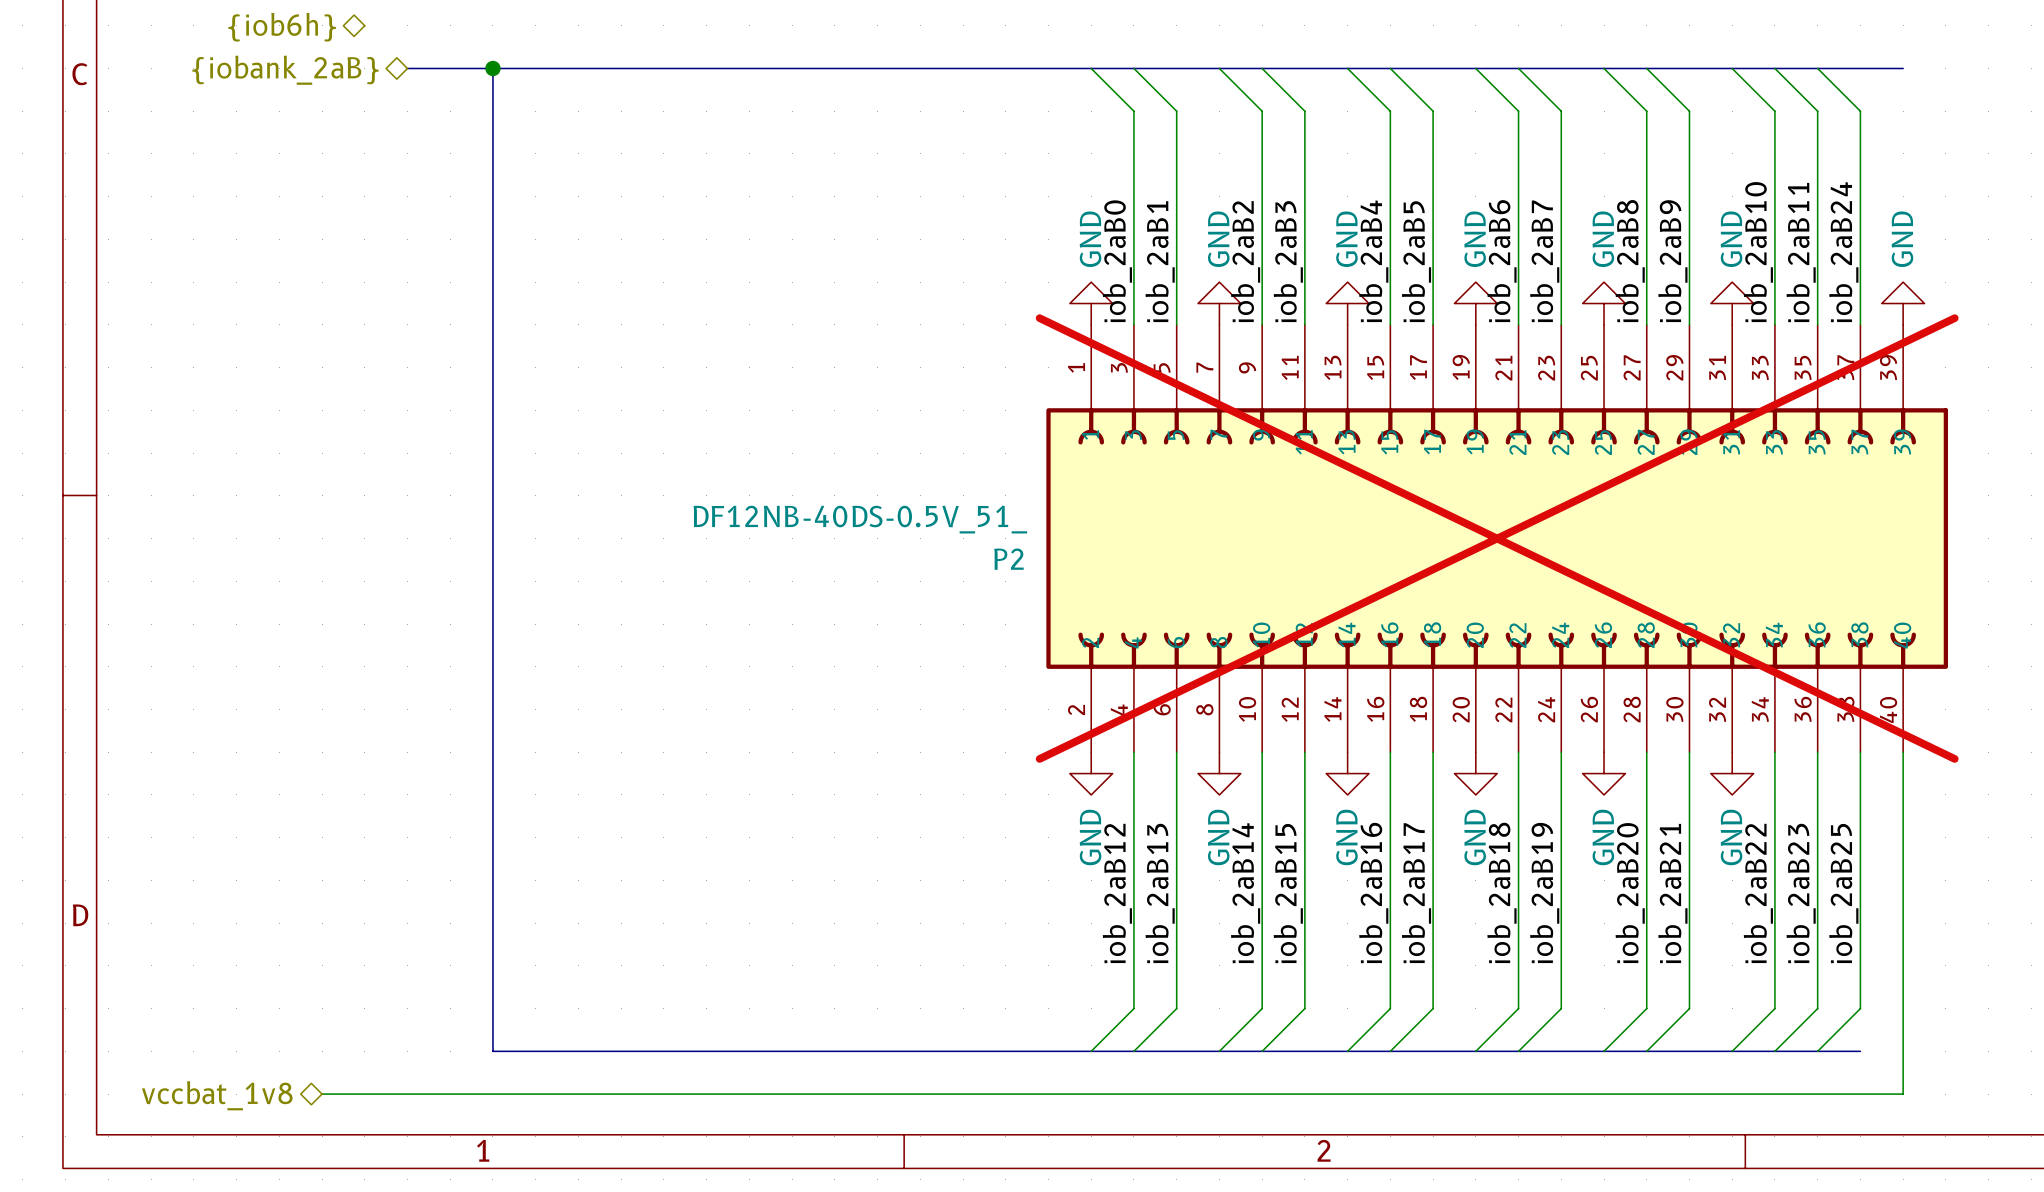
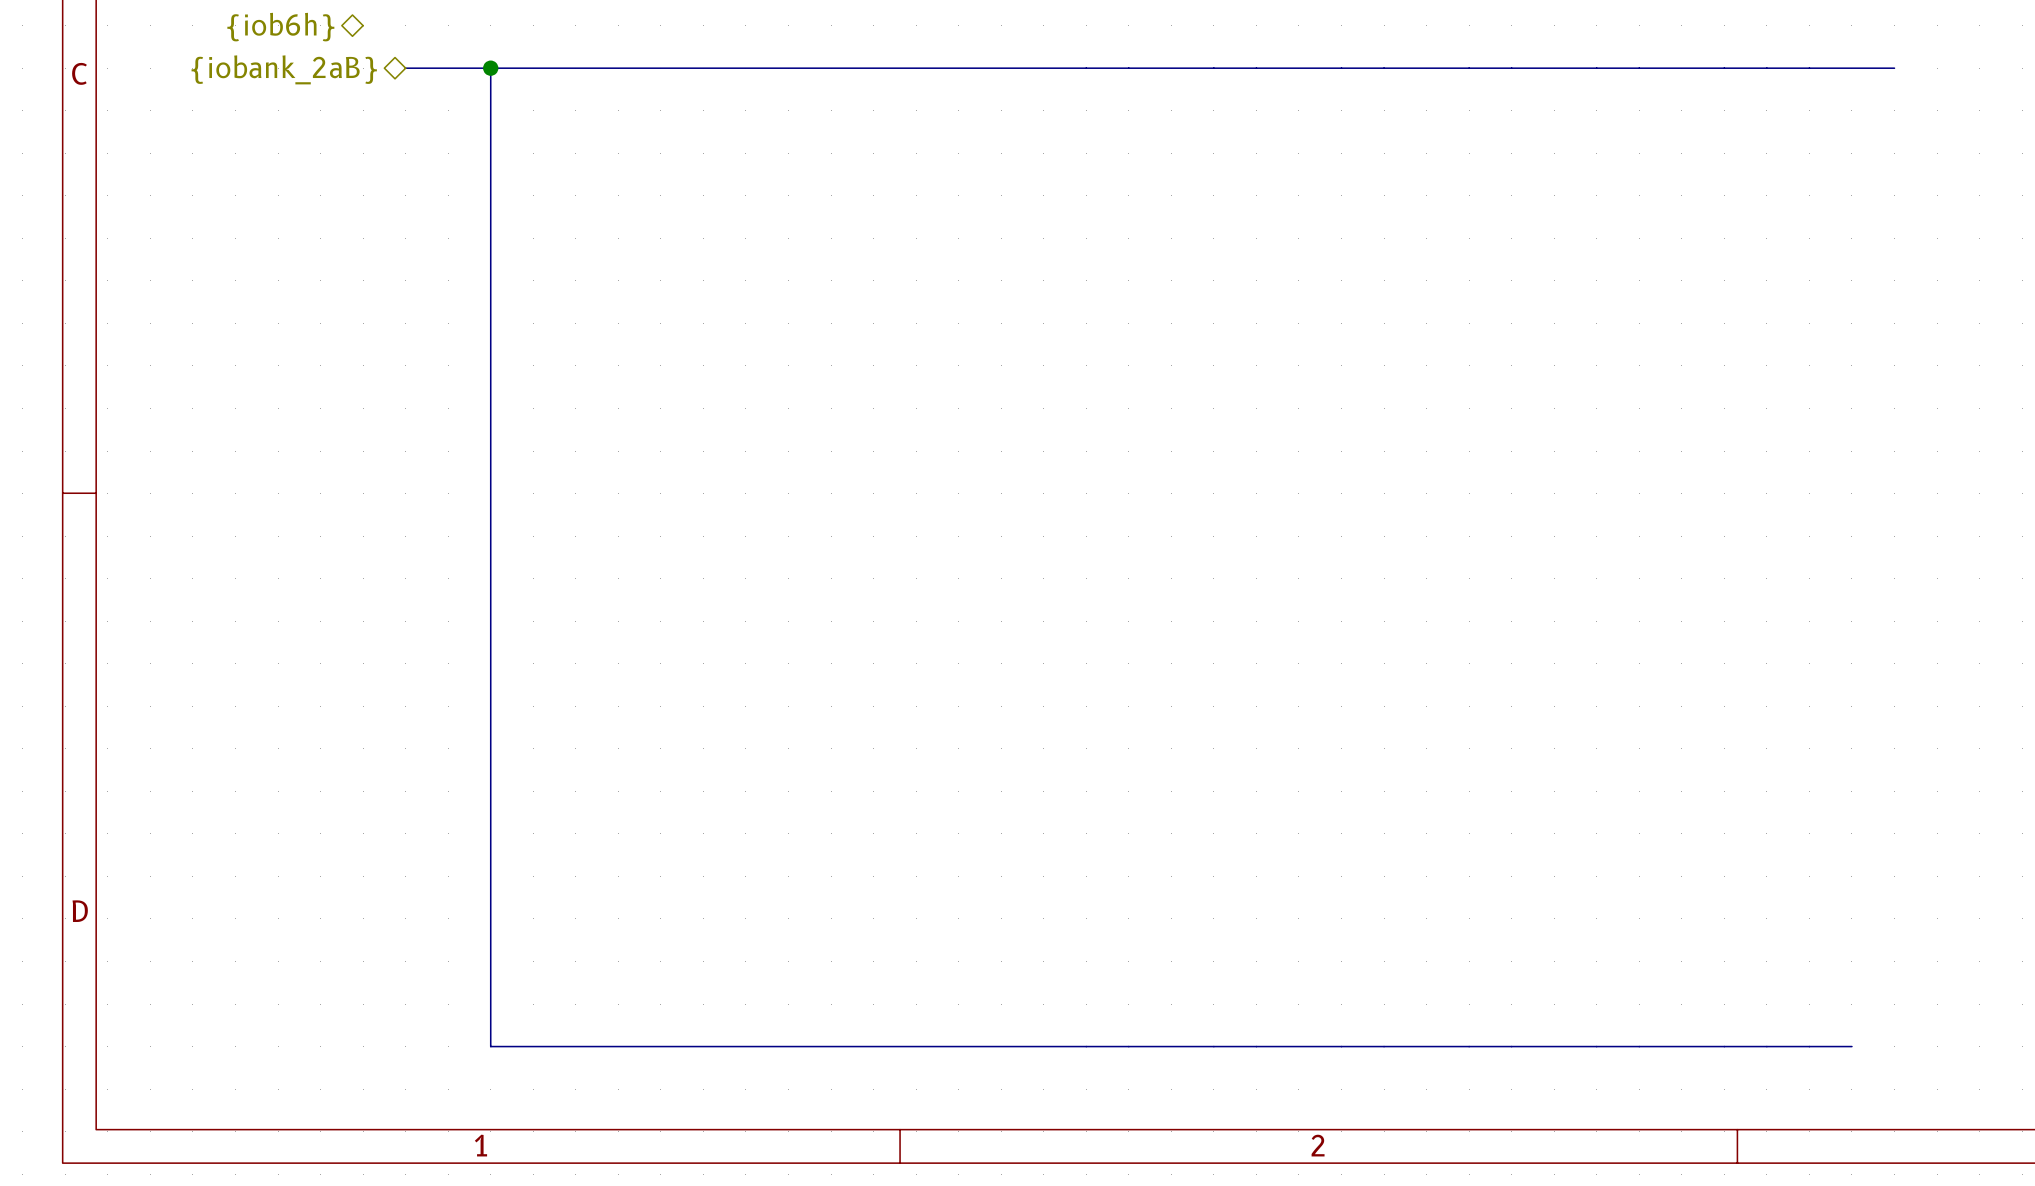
wire: (1091, 68) (1133, 111) (1133, 324) -> none
wire: (1133, 68) (1176, 111) (1176, 324) -> none
wire: (1219, 68) (1262, 111) (1262, 324) -> none
wire: (1262, 68) (1304, 111) (1304, 324) -> none
wire: (1347, 68) (1390, 111) (1390, 324) -> none
wire: (1390, 68) (1433, 111) (1433, 324) -> none
wire: (1475, 68) (1518, 111) (1518, 324) -> none
wire: (1518, 68) (1561, 111) (1561, 324) -> none
wire: (1604, 68) (1646, 111) (1646, 324) -> none
wire: (1646, 68) (1689, 111) (1689, 324) -> none
wire: (1732, 68) (1774, 111) (1774, 324) -> none
wire: (1774, 68) (1817, 111) (1817, 324) -> none
wire: (1817, 68) (1860, 111) (1860, 324) -> none
label: iob_2aB10 (1758, 252) -> none
label: iob_2aB11 (1801, 252) -> none
label: iob_2aB24 (1843, 252) -> none
label: iob_2aB0 (1117, 261) -> none
label: iob_2aB1 (1160, 261) -> none
label: iob_2aB2 (1245, 261) -> none
label: iob_2aB3 (1288, 261) -> none
label: iob_2aB4 (1373, 261) -> none
label: iob_2aB5 (1416, 261) -> none
label: iob_2aB6 (1501, 261) -> none
label: iob_2aB7 (1544, 261) -> none
label: iob_2aB8 (1630, 261) -> none
label: iob_2aB9 (1672, 261) -> none
power symbol: GND (1091, 303) -> none
power symbol: GND (1219, 303) -> none
power symbol: GND (1347, 303) -> none
power symbol: GND (1475, 303) -> none
power symbol: GND (1604, 303) -> none
power symbol: GND (1732, 303) -> none
power symbol: GND (1903, 303) -> none
P2: DF12NB-40DS-0.5V_51_ (1497, 538) -> none
wire: (1133, 752) (1133, 1008) (1091, 1051) -> none
wire: (1176, 752) (1176, 1008) (1133, 1051) -> none
wire: (1262, 752) (1262, 1008) (1219, 1051) -> none
wire: (1304, 752) (1304, 1008) (1262, 1051) -> none
wire: (1390, 752) (1390, 1008) (1347, 1051) -> none
wire: (1433, 752) (1433, 1008) (1390, 1051) -> none
wire: (1518, 752) (1518, 1008) (1475, 1051) -> none
wire: (1561, 752) (1561, 1008) (1518, 1051) -> none
wire: (1646, 752) (1646, 1008) (1604, 1051) -> none
wire: (1689, 752) (1689, 1008) (1646, 1051) -> none
wire: (1774, 752) (1774, 1008) (1732, 1051) -> none
wire: (1817, 752) (1817, 1008) (1774, 1051) -> none
wire: (1860, 752) (1860, 1008) (1817, 1051) -> none
wire: (1903, 752) (1903, 1094) (322, 1094) -> none
power symbol: GND (1091, 773) -> none
power symbol: GND (1219, 773) -> none
power symbol: GND (1347, 773) -> none
power symbol: GND (1475, 773) -> none
power symbol: GND (1604, 773) -> none
power symbol: GND (1732, 773) -> none
label: iob_2aB16 (1373, 892) -> none
label: iob_2aB18 (1501, 892) -> none
label: iob_2aB12 (1117, 893) -> none
label: iob_2aB13 (1160, 893) -> none
label: iob_2aB14 (1245, 893) -> none
label: iob_2aB15 (1288, 893) -> none
label: iob_2aB17 (1416, 893) -> none
label: iob_2aB19 (1544, 893) -> none
label: iob_2aB20 (1630, 893) -> none
label: iob_2aB21 (1672, 893) -> none
label: iob_2aB22 (1758, 893) -> none
label: iob_2aB23 (1801, 893) -> none
label: iob_2aB25 (1843, 893) -> none
hierarchical label: vccbat_1v8 (217, 1095) -> none

